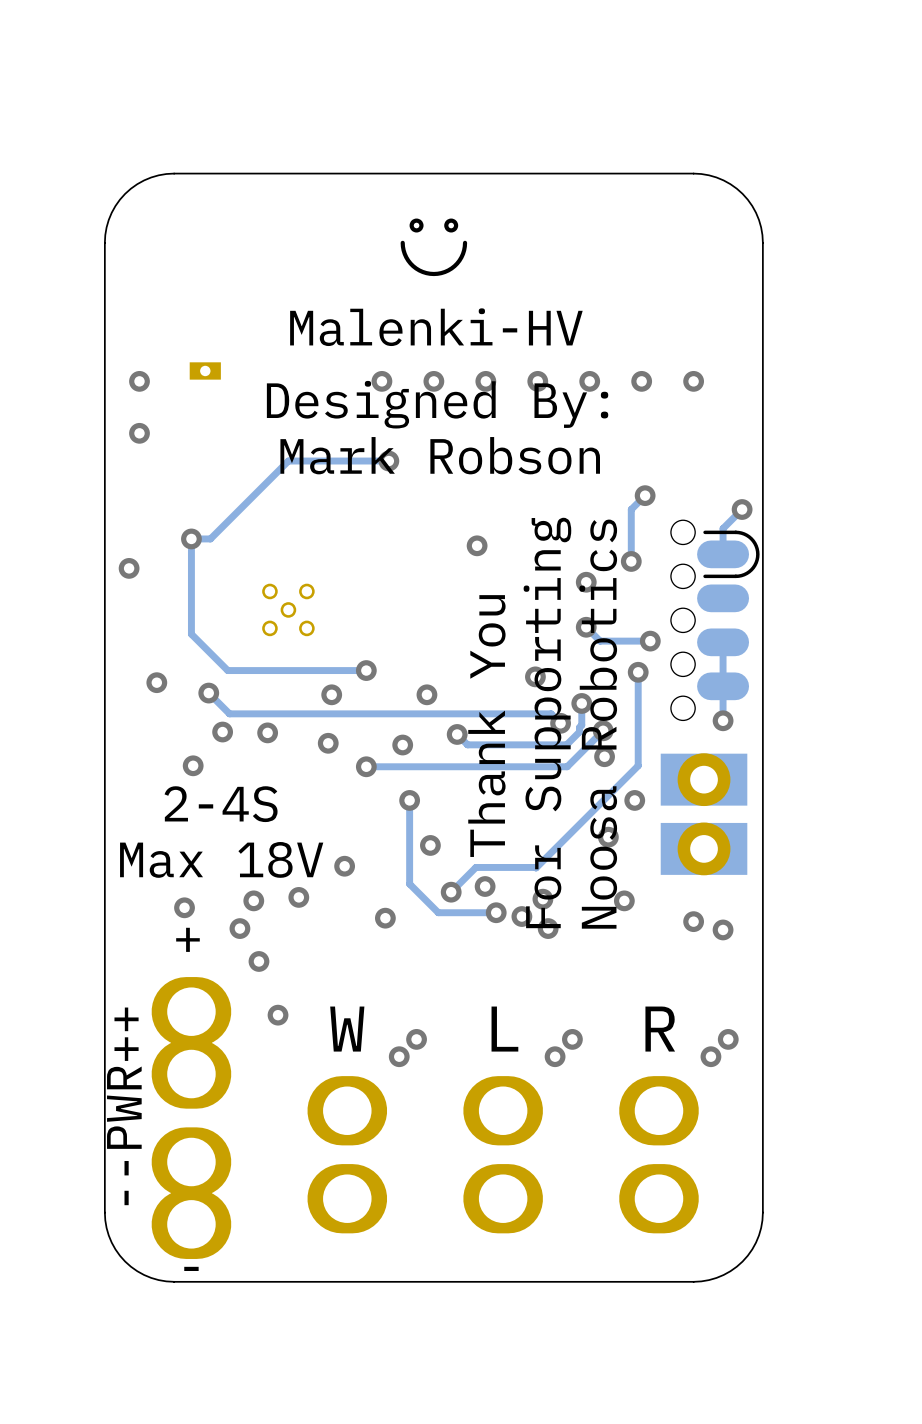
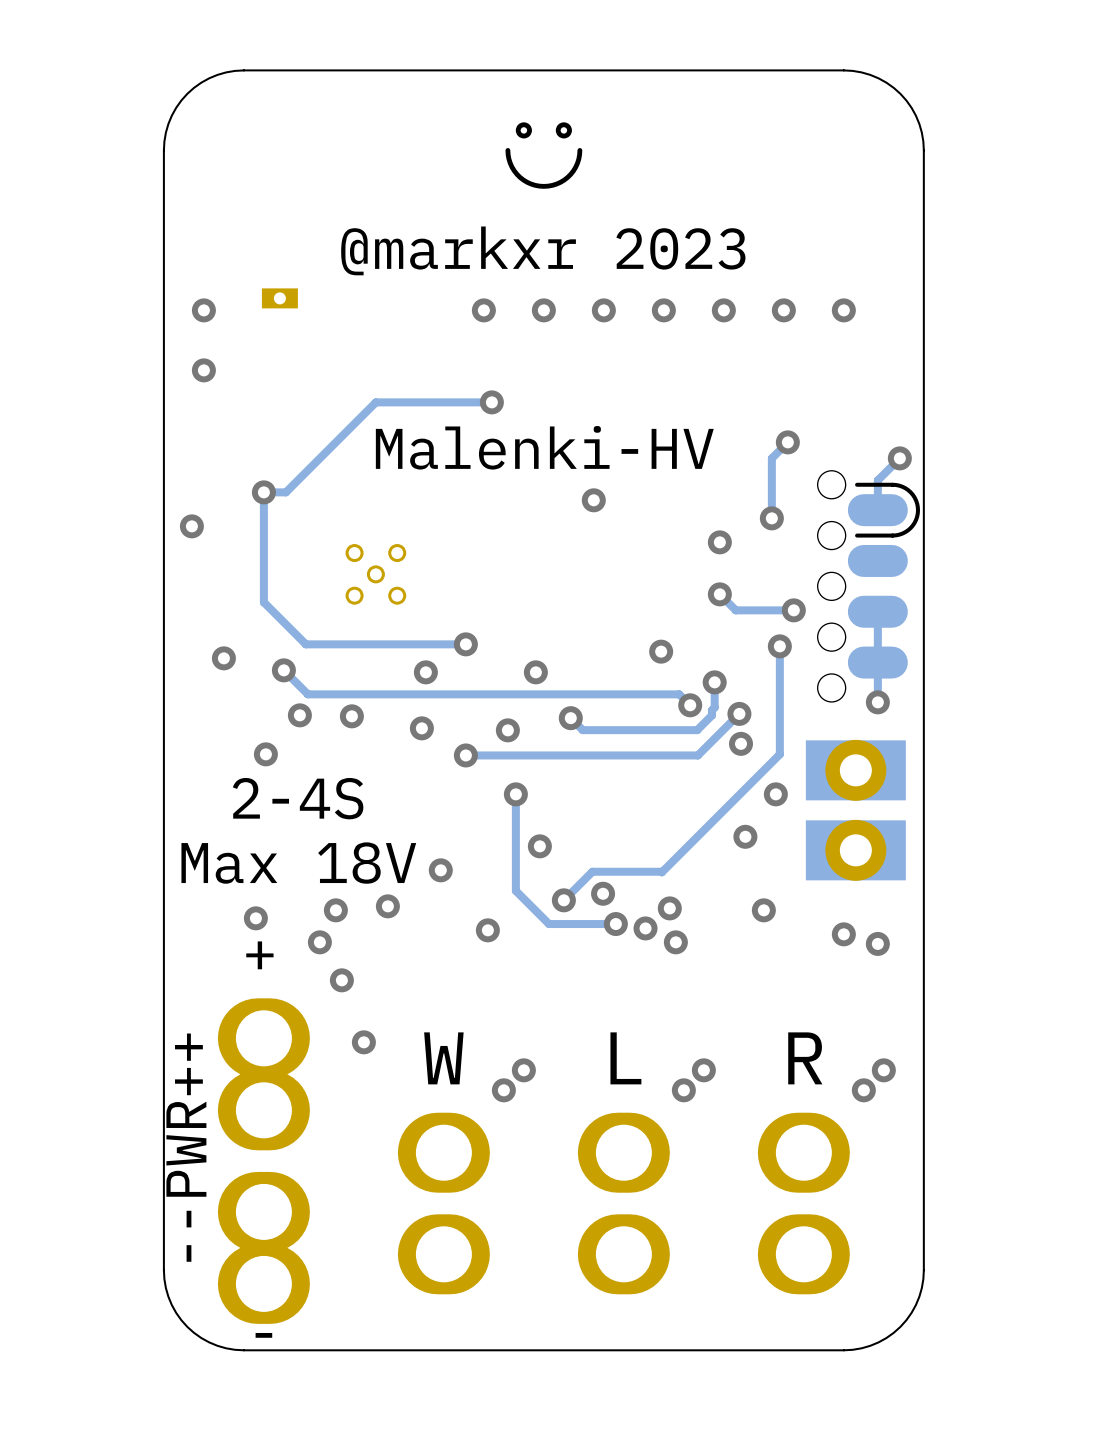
text: Malenki-HV (436, 327) -> @markxr 2023 (543, 250)
text: Designed By: (437, 404) -> none
text: Mark Robson (440, 455) -> none
text: none -> Malenki-HV (544, 447)
text: For Supporting (547, 722) -> none
text: Noosa Robotics (598, 724) -> none
text: Thank You (486, 726) -> none

